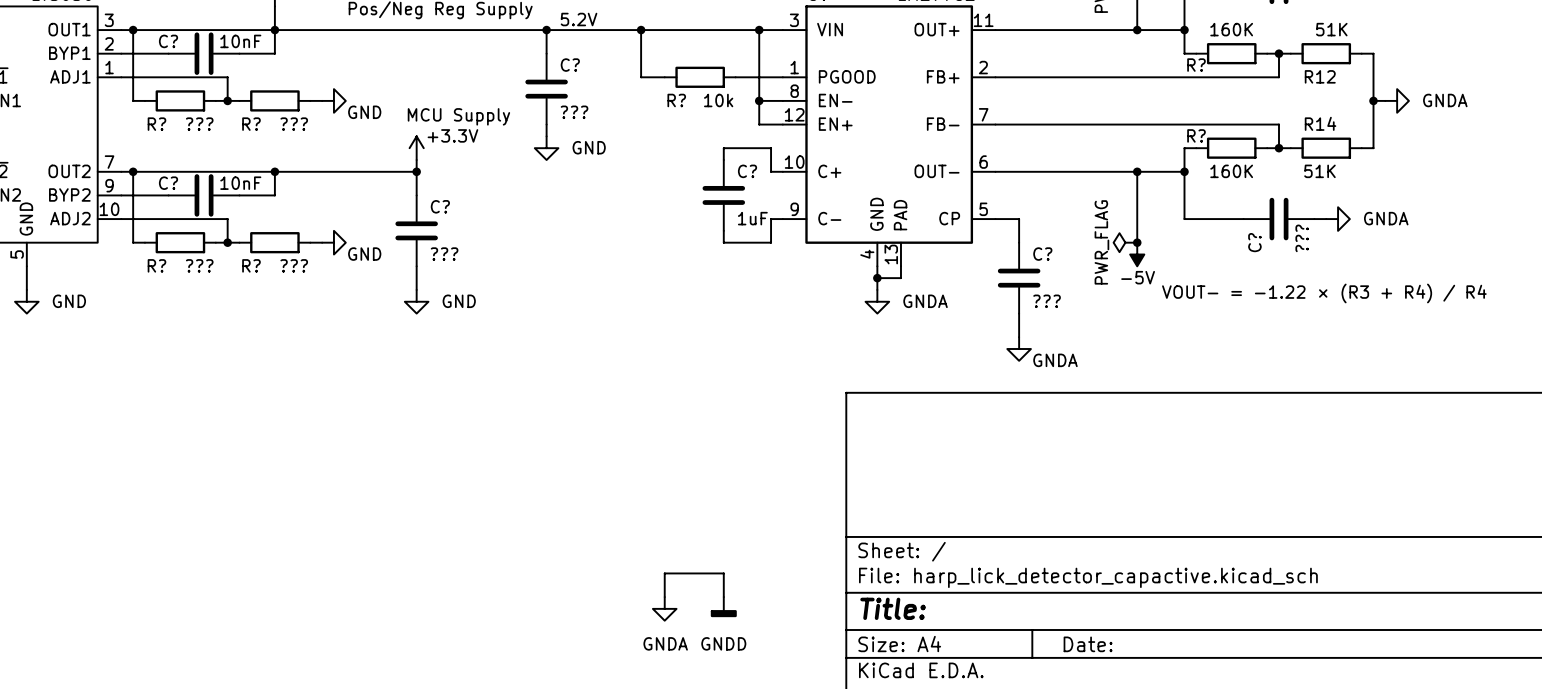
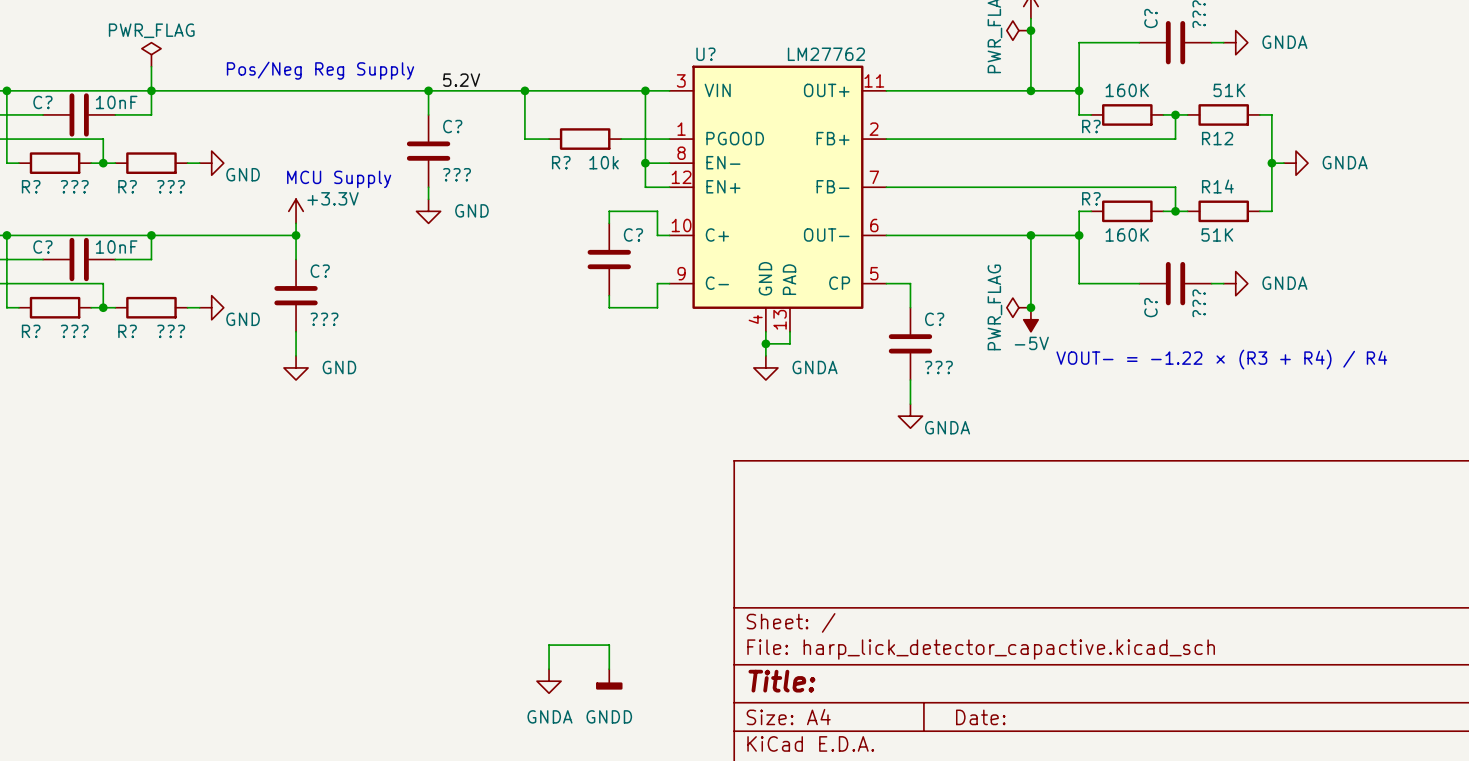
C? value: 1uF (752, 218) -> none

